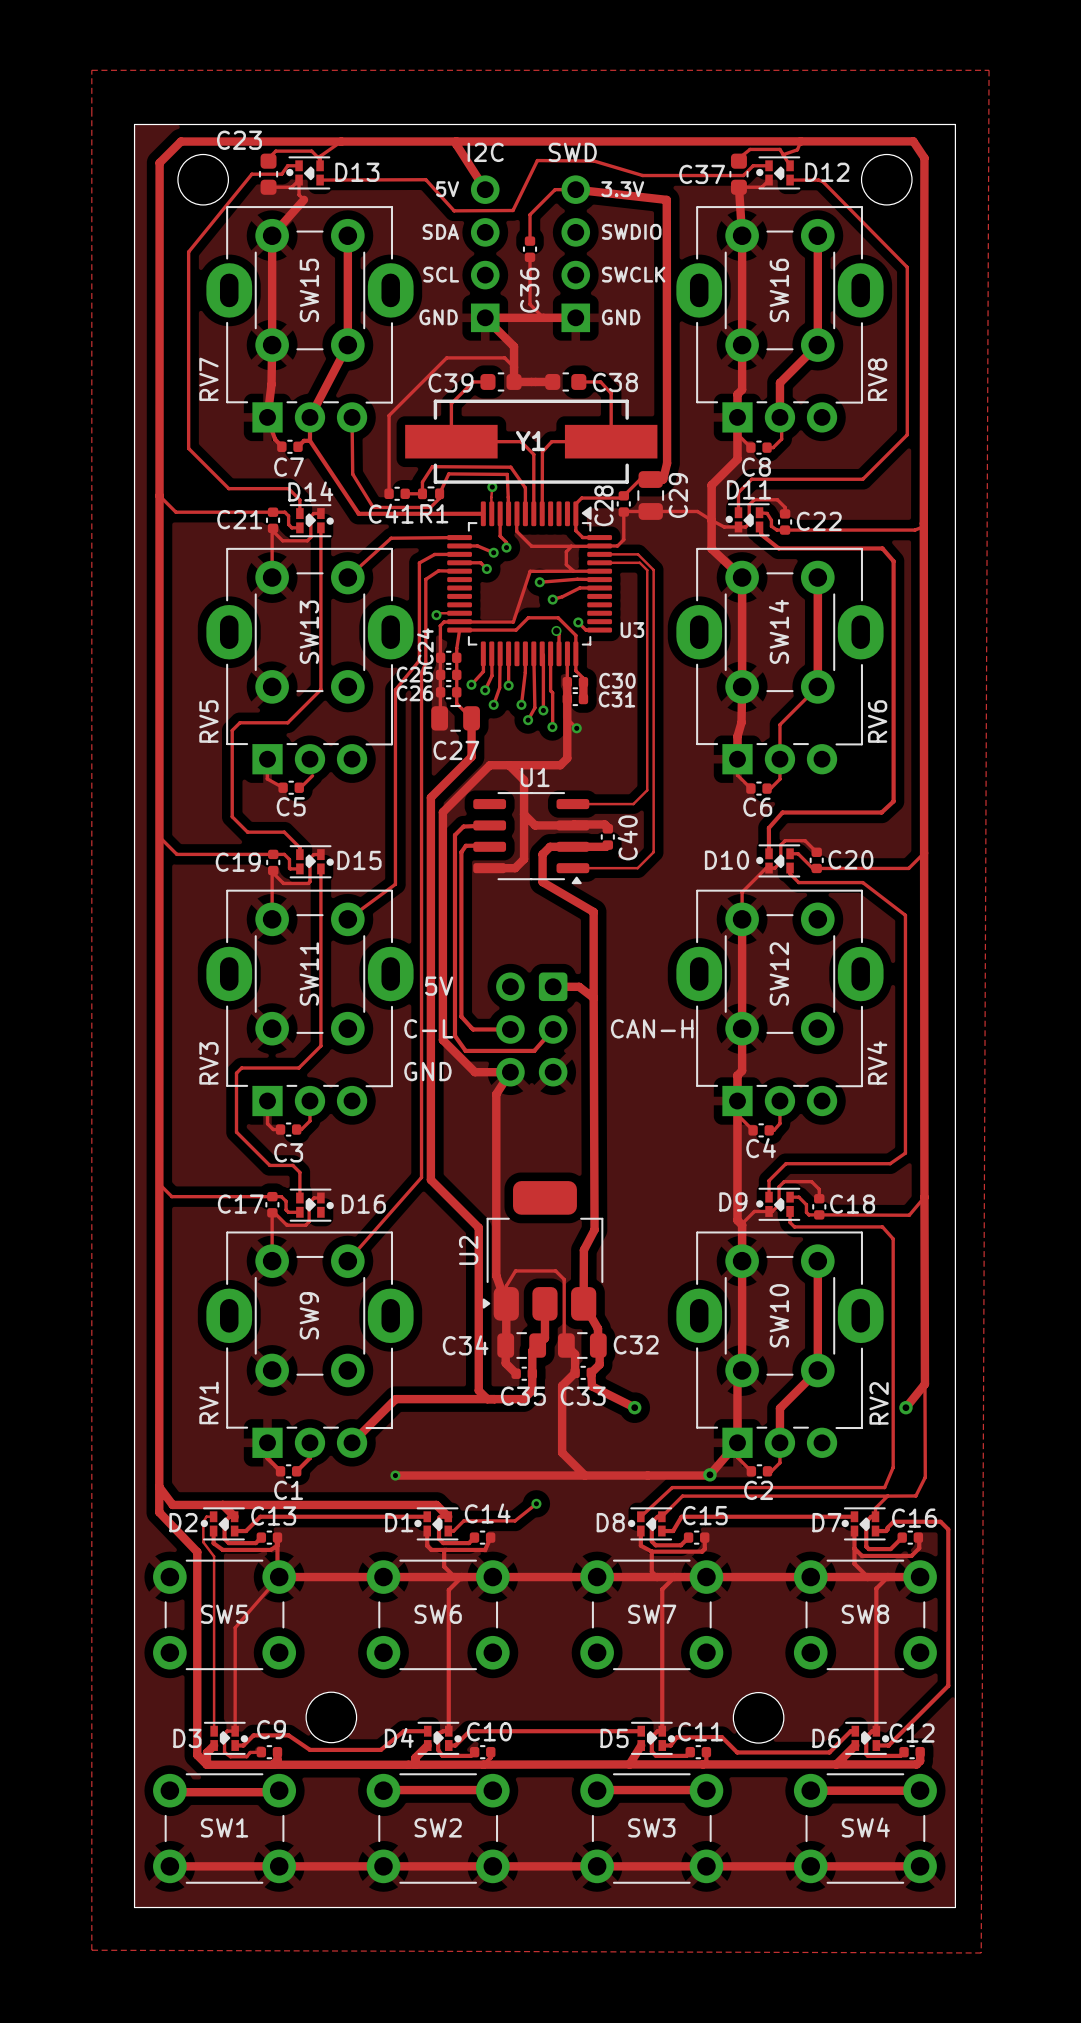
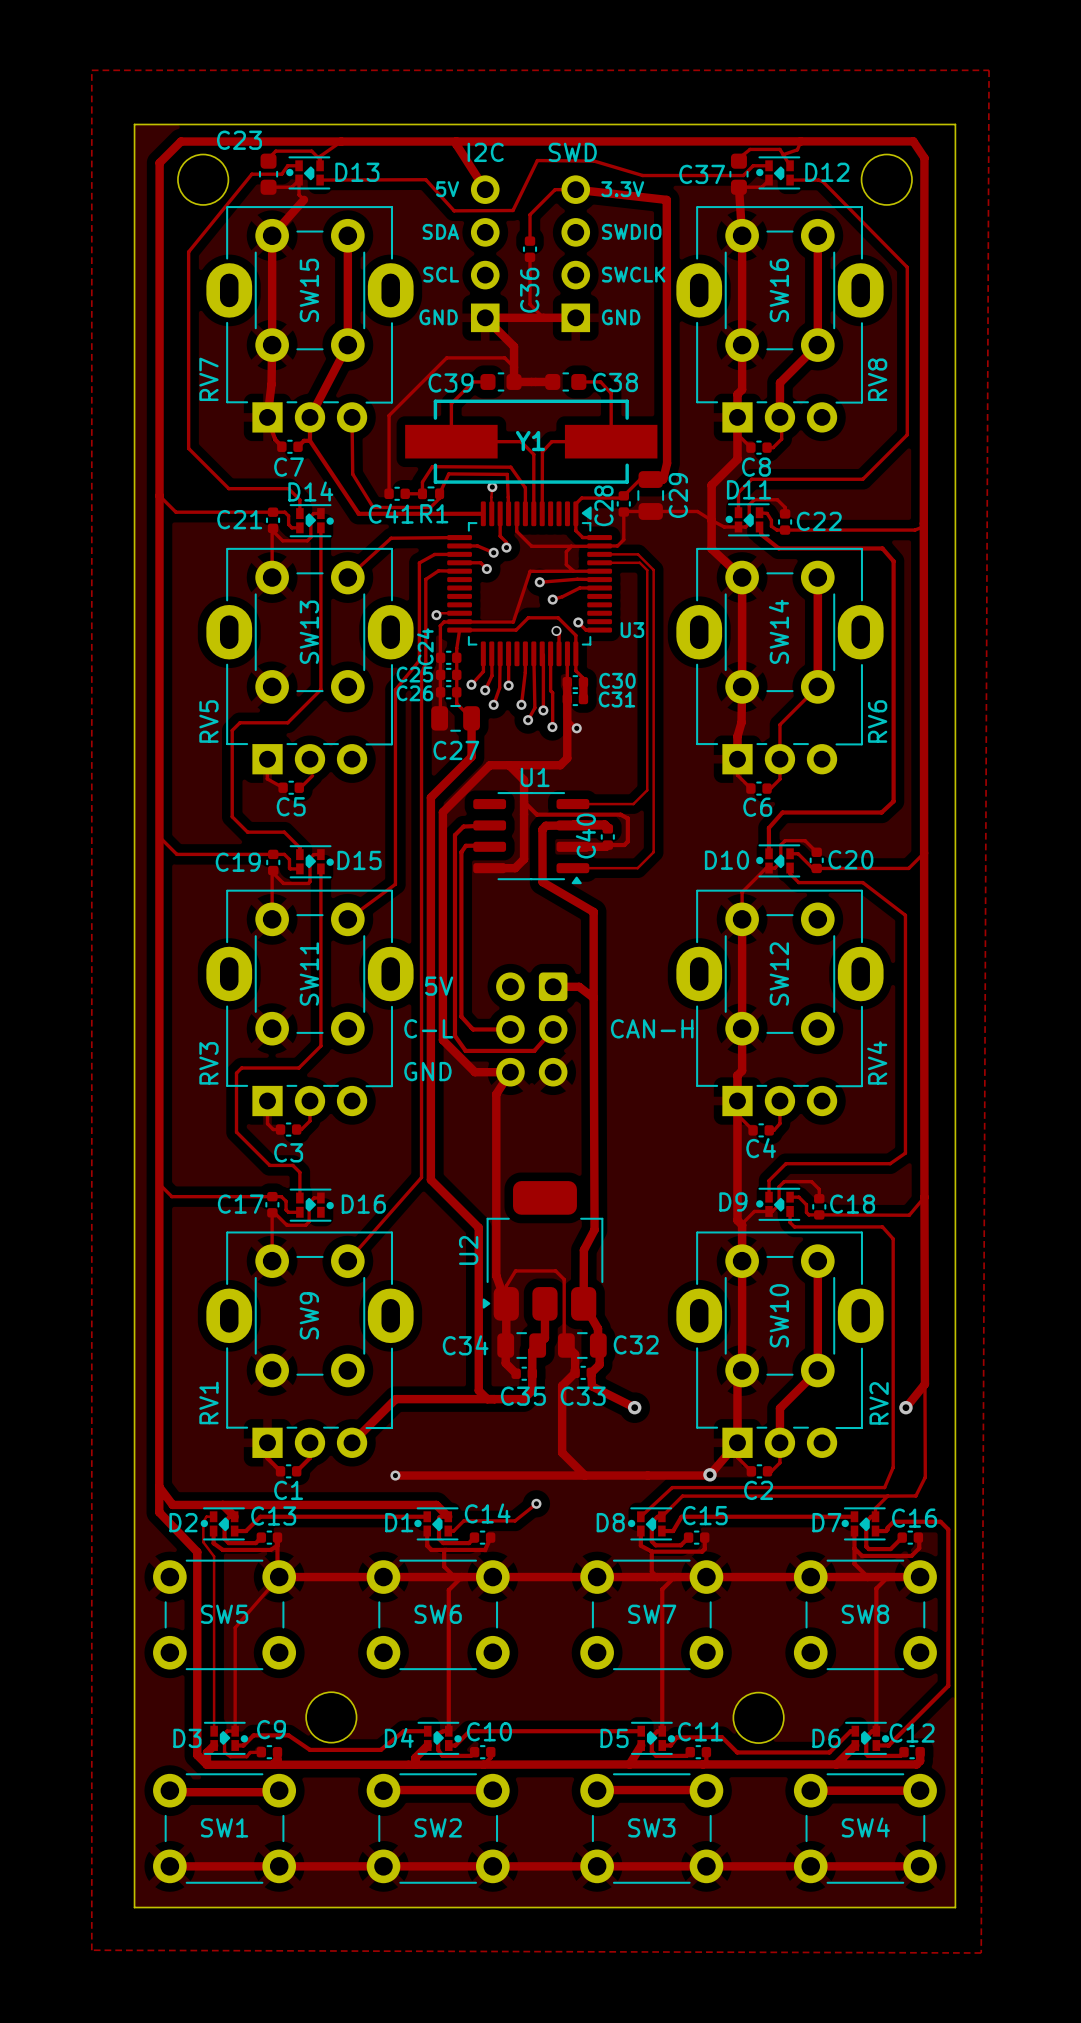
track: none -> (524, 801) (536, 814) (620, 814) (627, 818) (627, 841) (624, 845) (607, 845)
track: (524, 814) (535, 825) (572, 825) -> none
C40 name position: C40 (627, 837) -> C40 (585, 836)
track: (572, 846) (550, 846) (542, 854) (542, 882) -> (607, 828) (604, 825) (545, 825) (542, 829) (542, 882)

